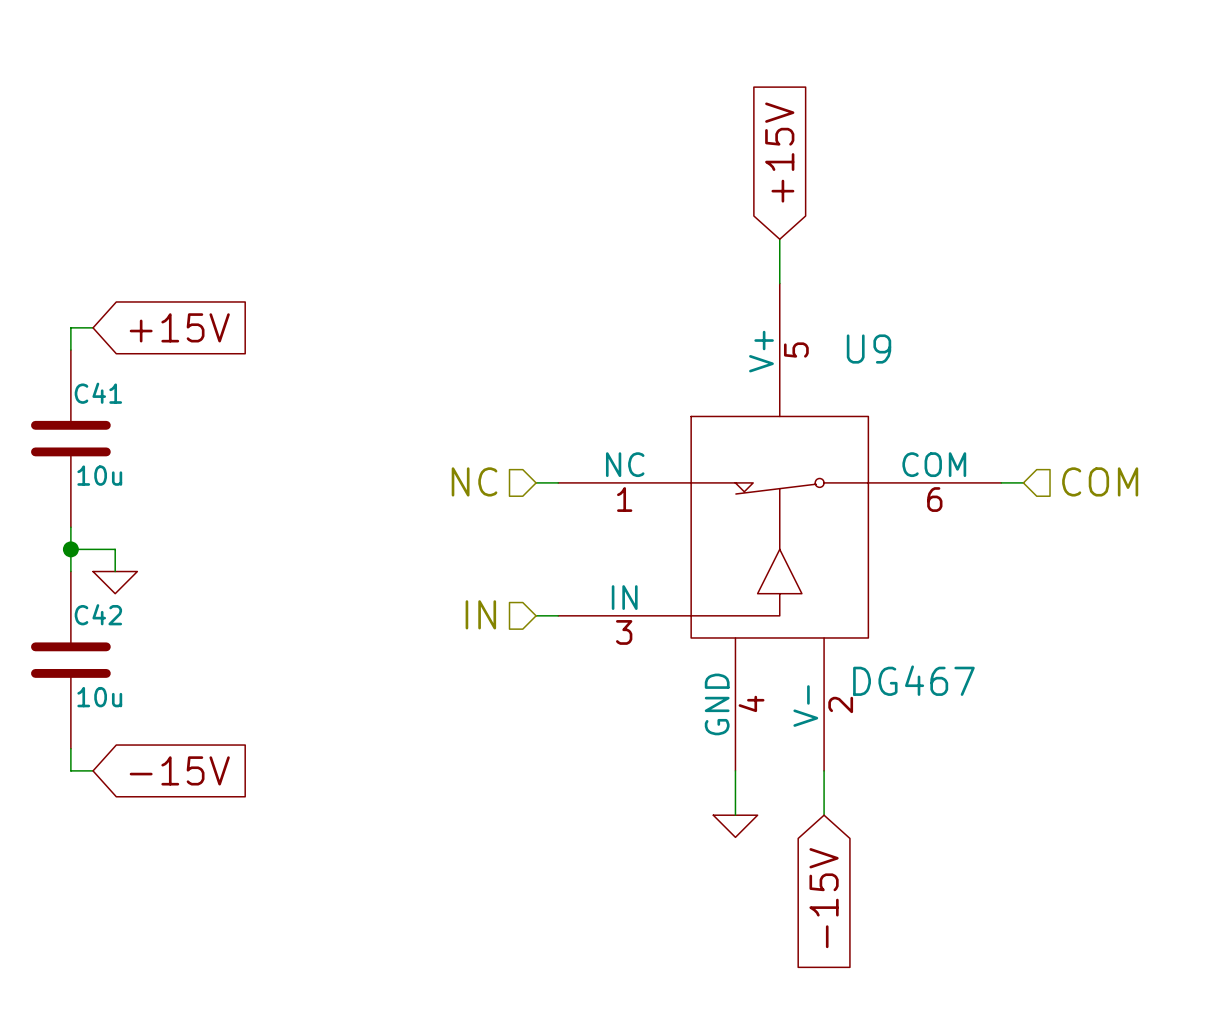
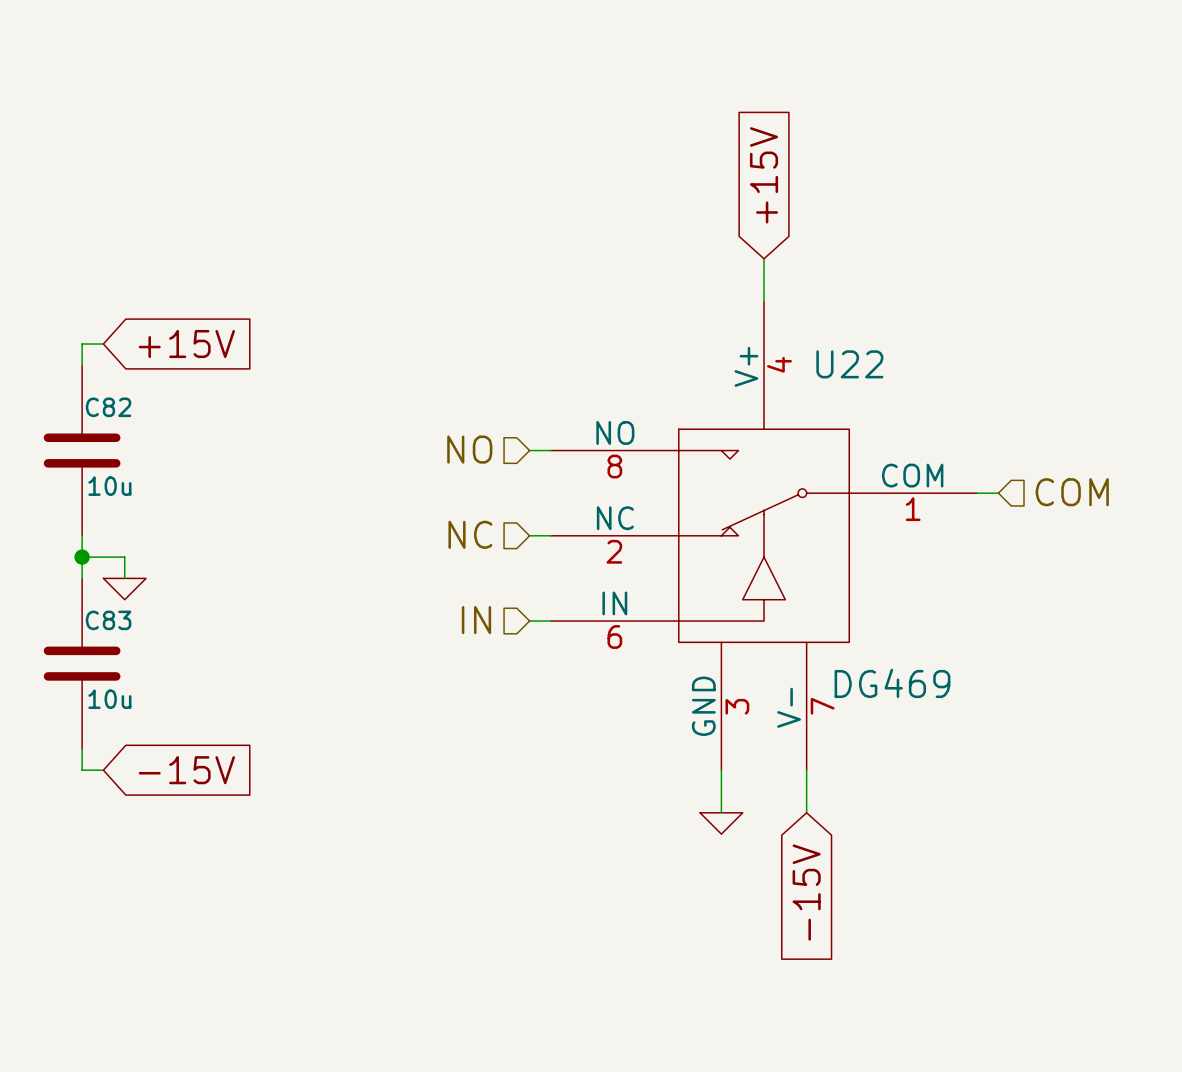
C41 name: C41 (98, 393) -> C82 (108, 407)
hierarchical label: none -> NO (469, 449)
hierarchical label position: NC (474, 481) -> NC (470, 534)
wire: (536, 482) (558, 482) -> (529, 450) (550, 450)
wire: none -> (529, 535) (550, 535)
U9: DG467 (779, 527) -> none
U22: none -> DG469 (764, 535)
C42 name: C42 (98, 614) -> C83 (108, 620)

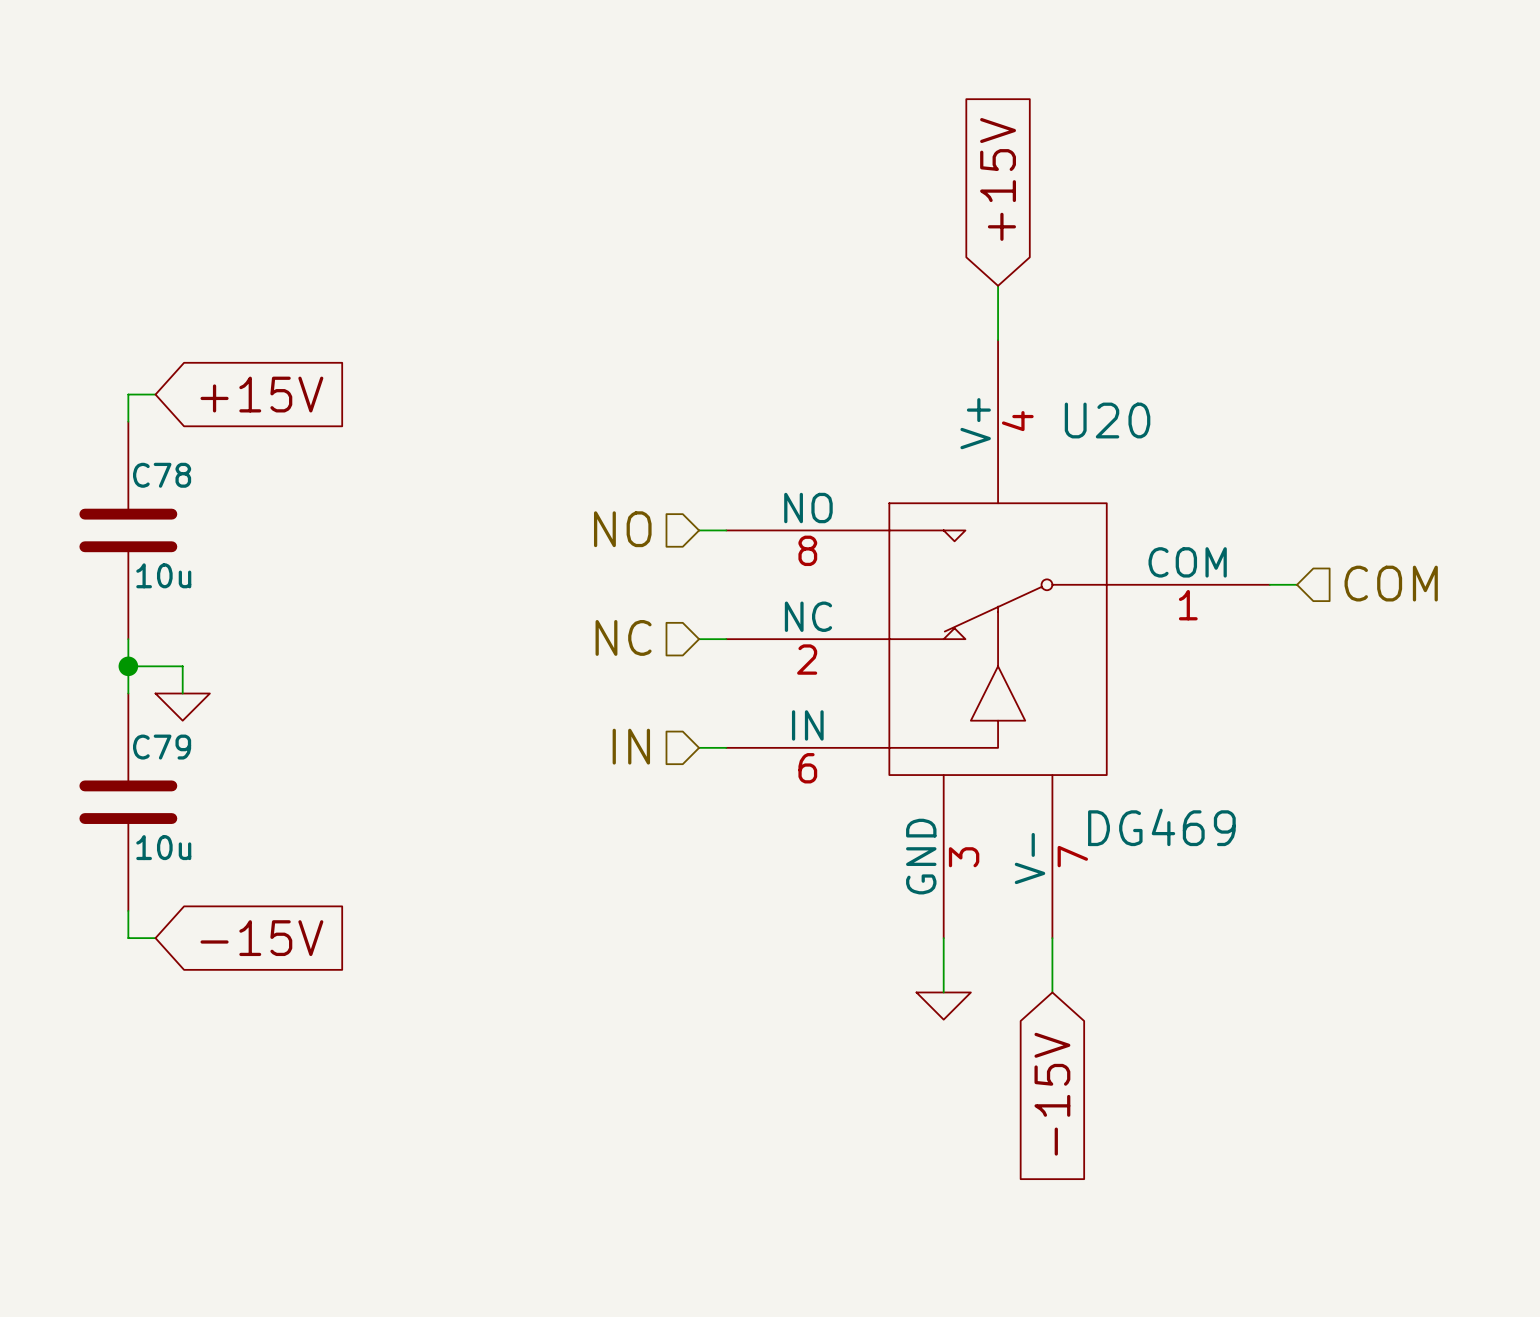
U22 name: U22 (849, 364) -> U20 (1107, 420)
C82 name: C82 (108, 407) -> C78 (162, 475)
C83 name: C83 (108, 620) -> C79 (162, 747)

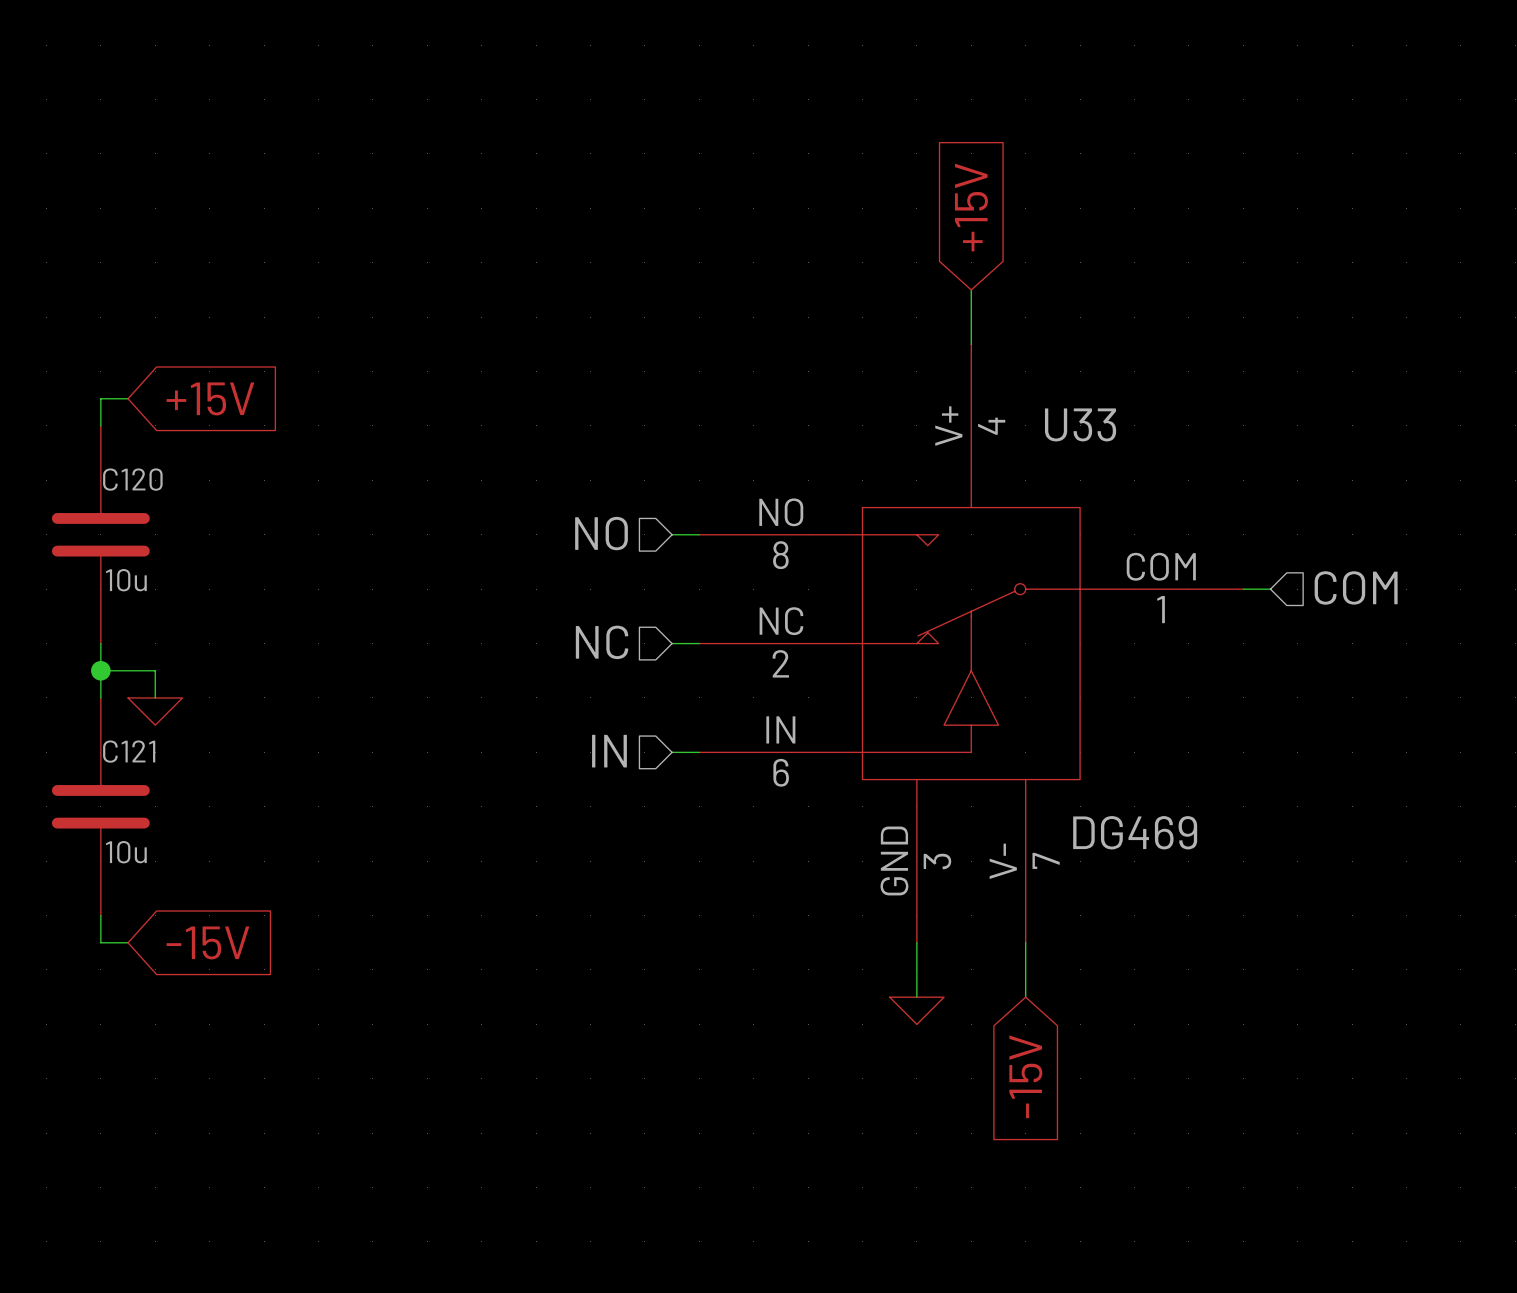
U20 name: U20 (1107, 420) -> U33 (1080, 424)
C78 name: C78 (162, 475) -> C120 (132, 479)
C79 name: C79 (162, 747) -> C121 (129, 751)

